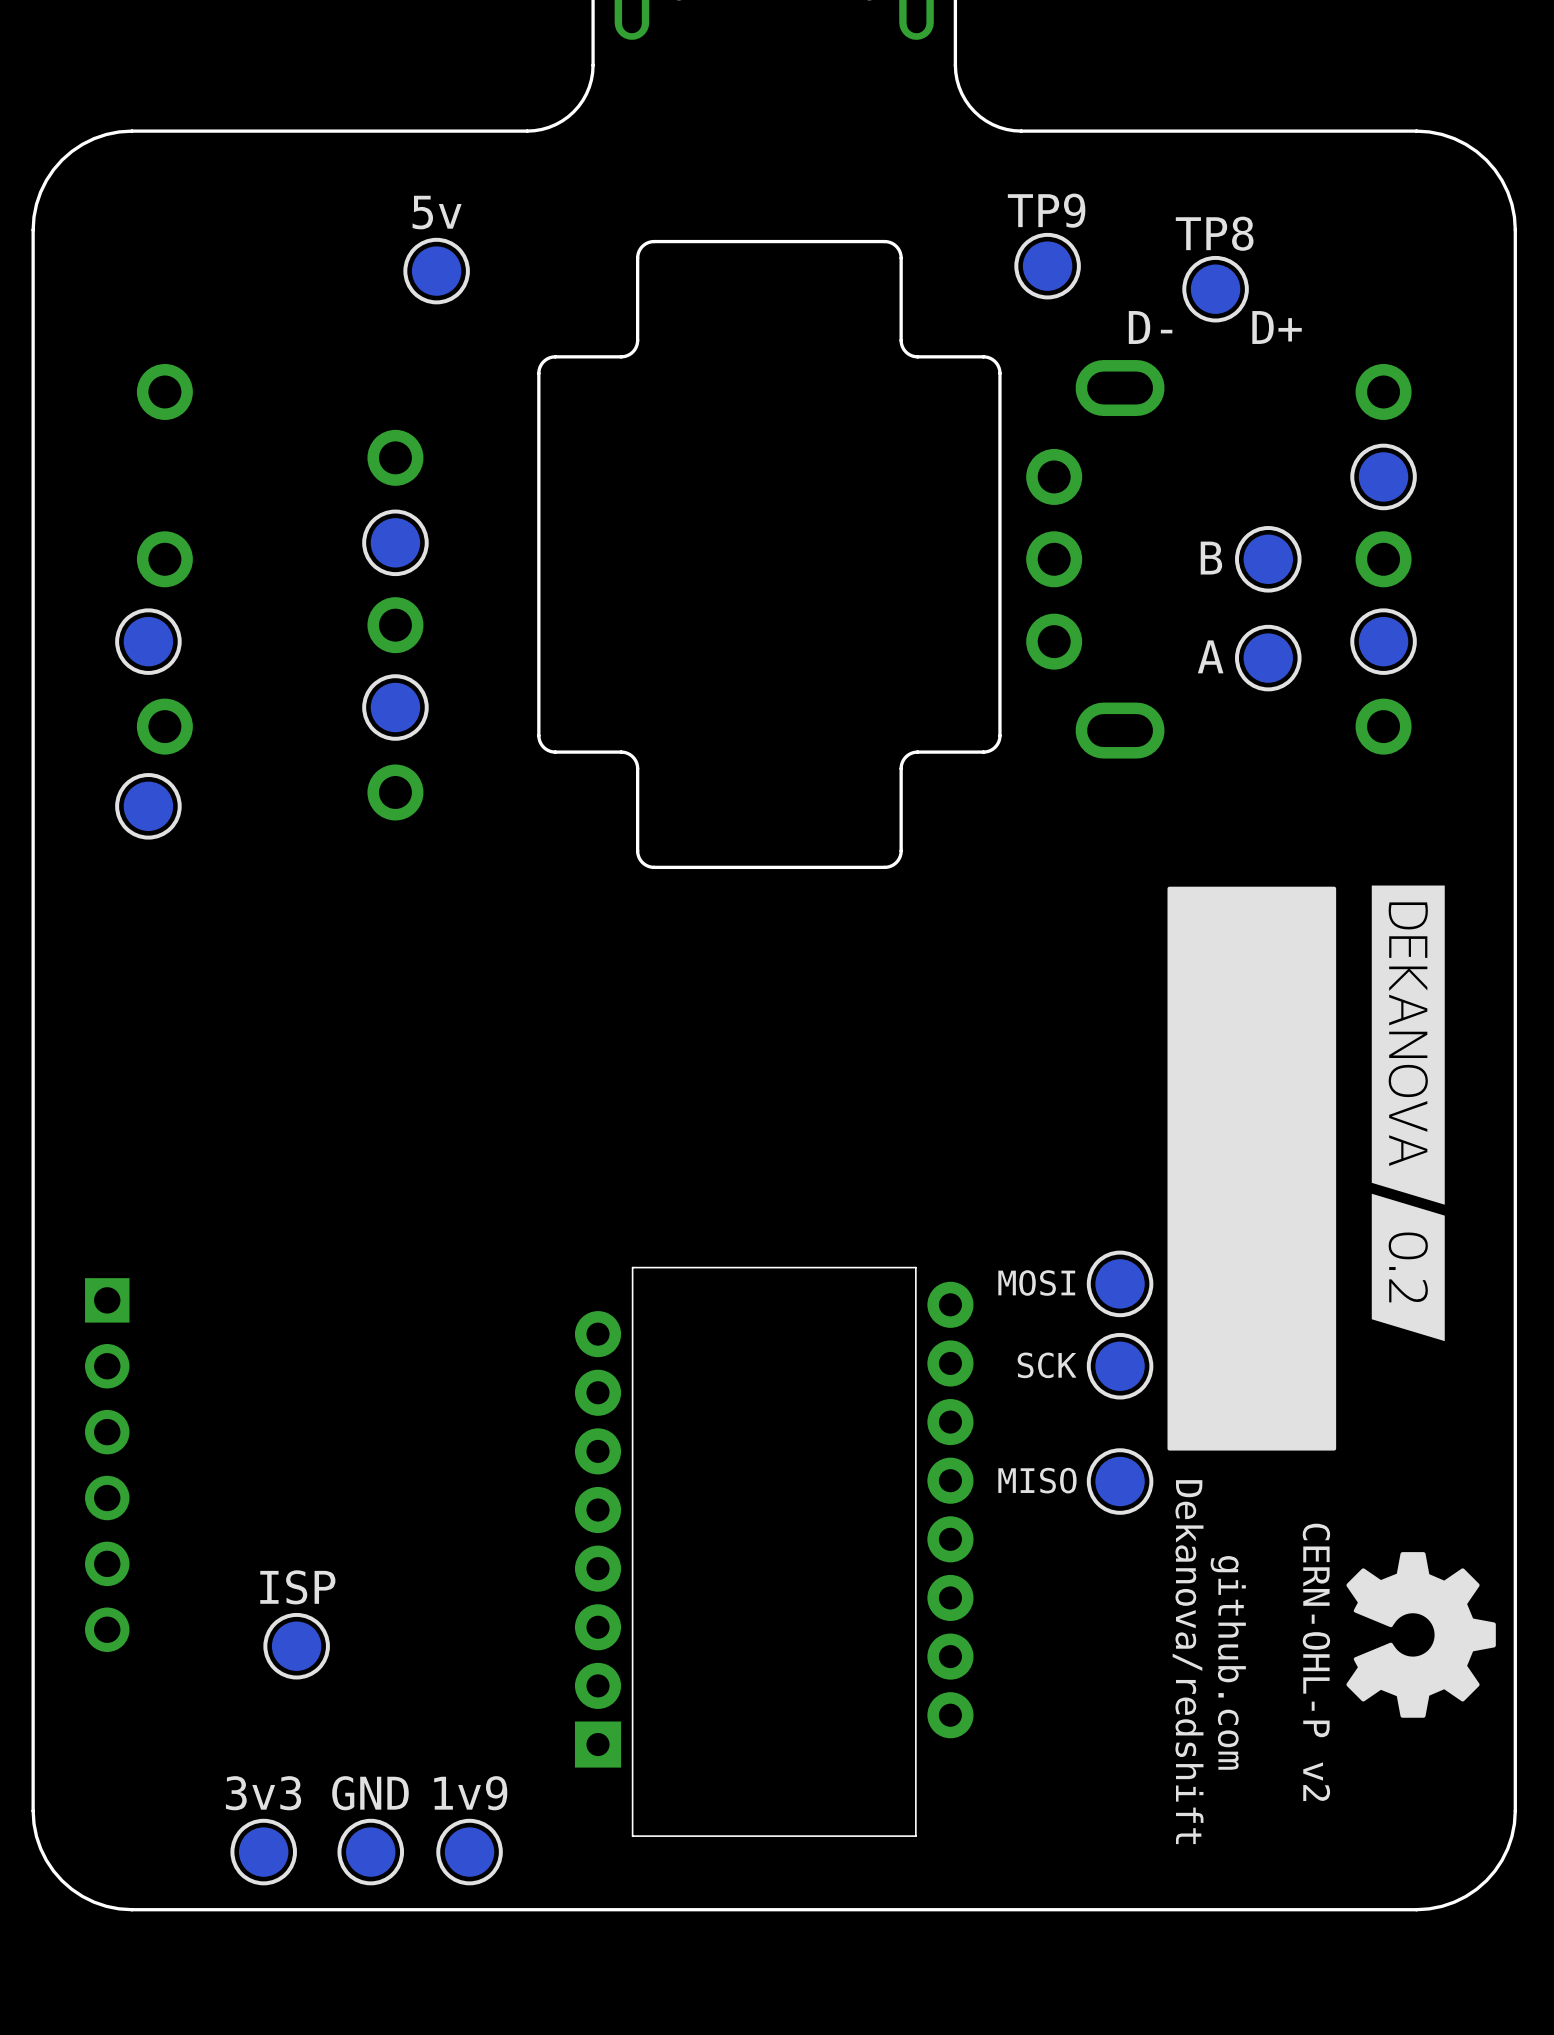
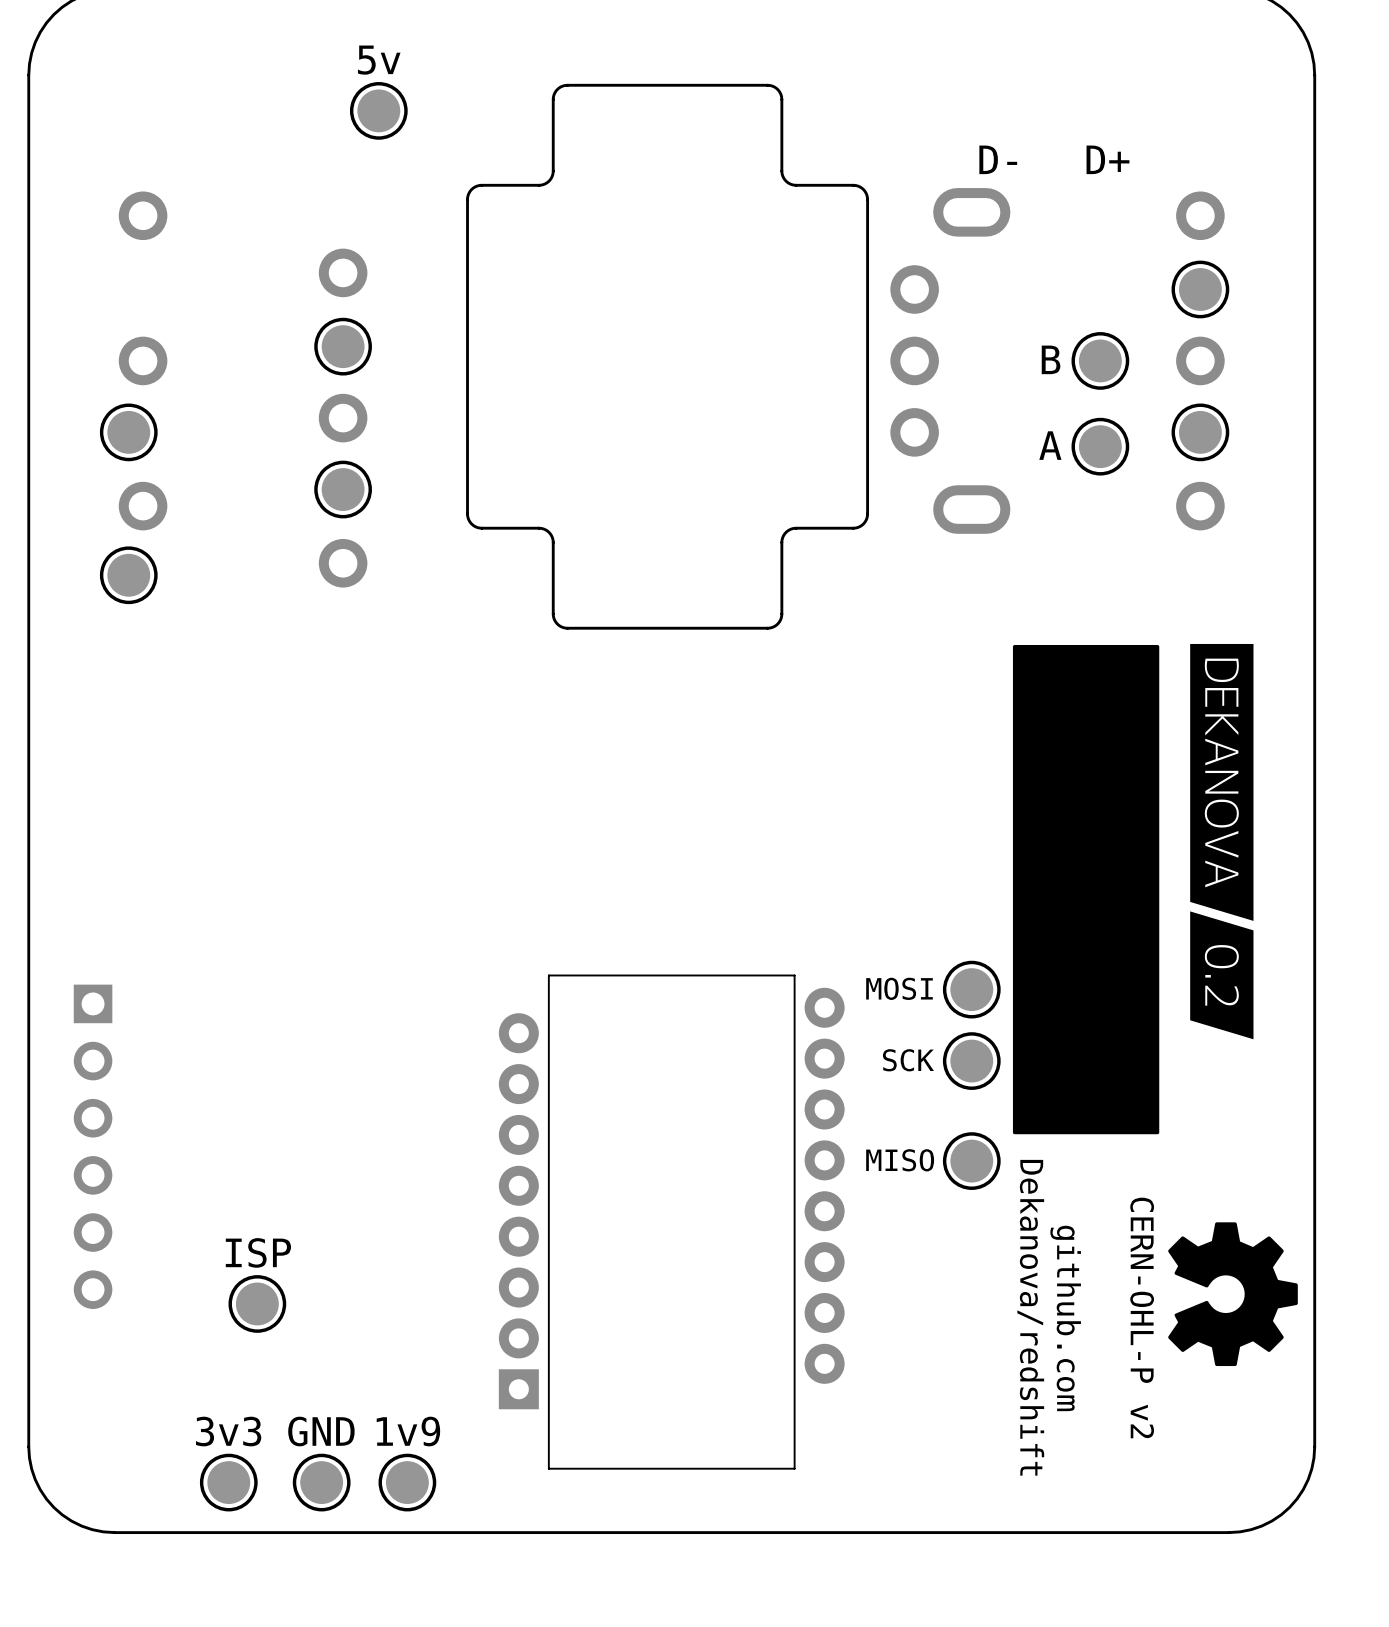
TP9: (1047, 266) -> none
TP8: (1215, 289) -> none

